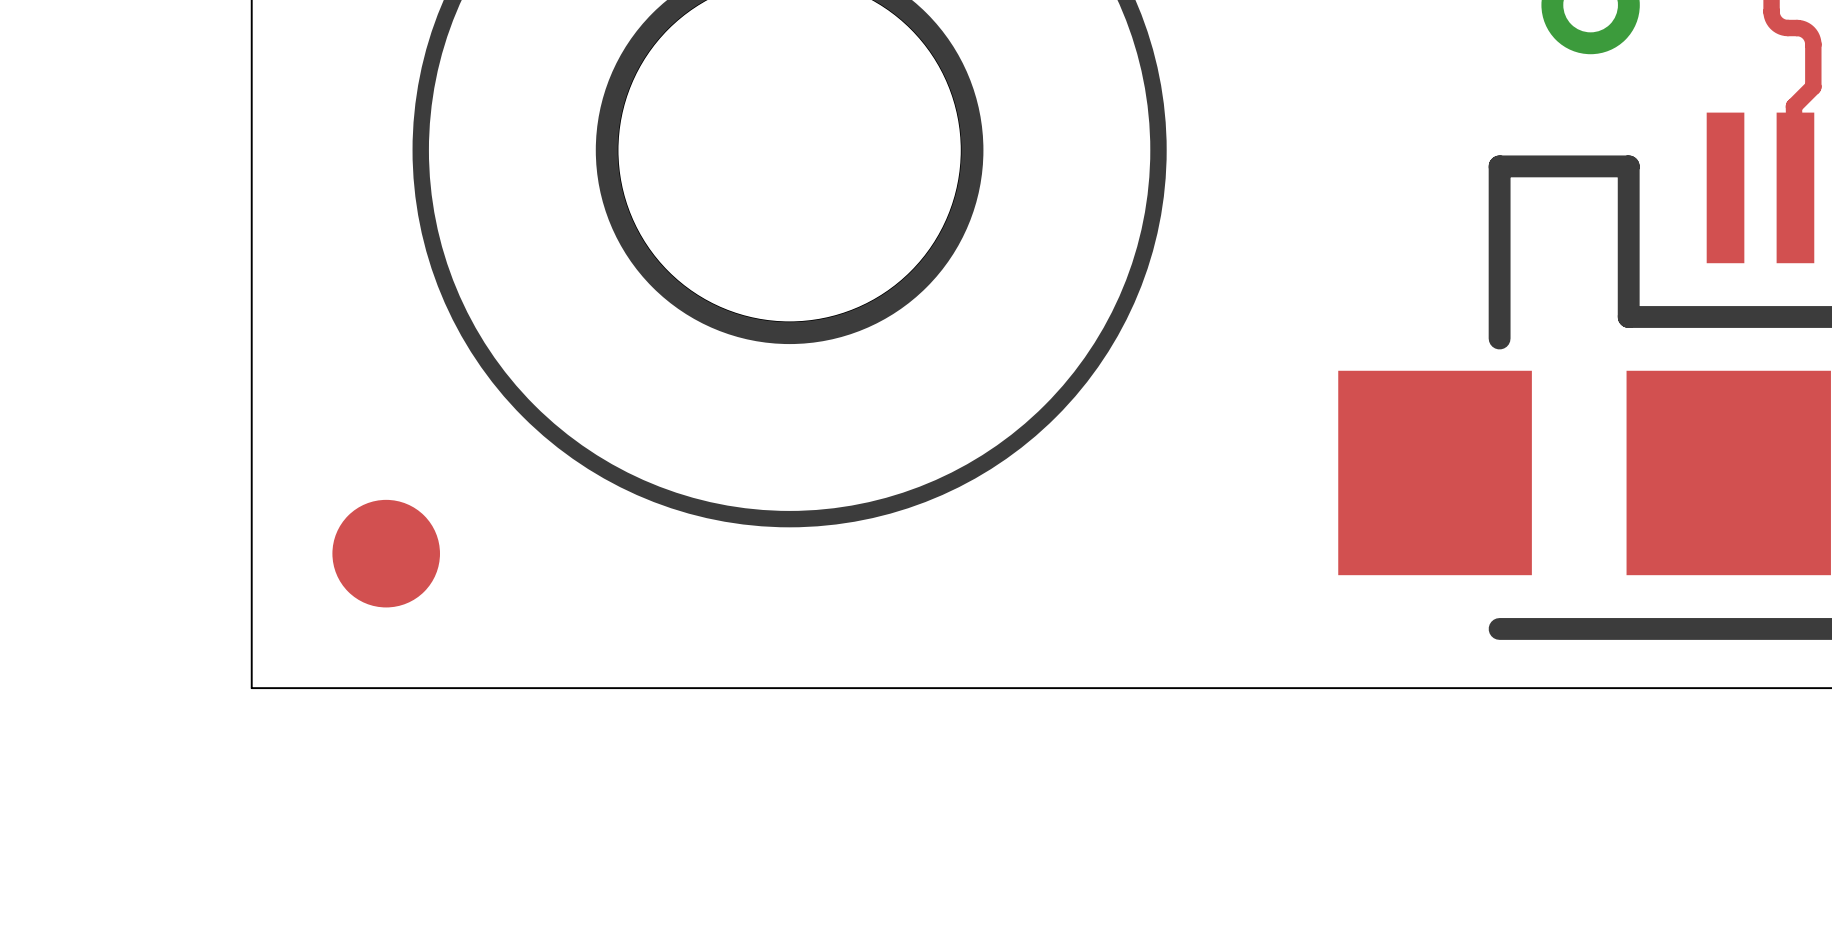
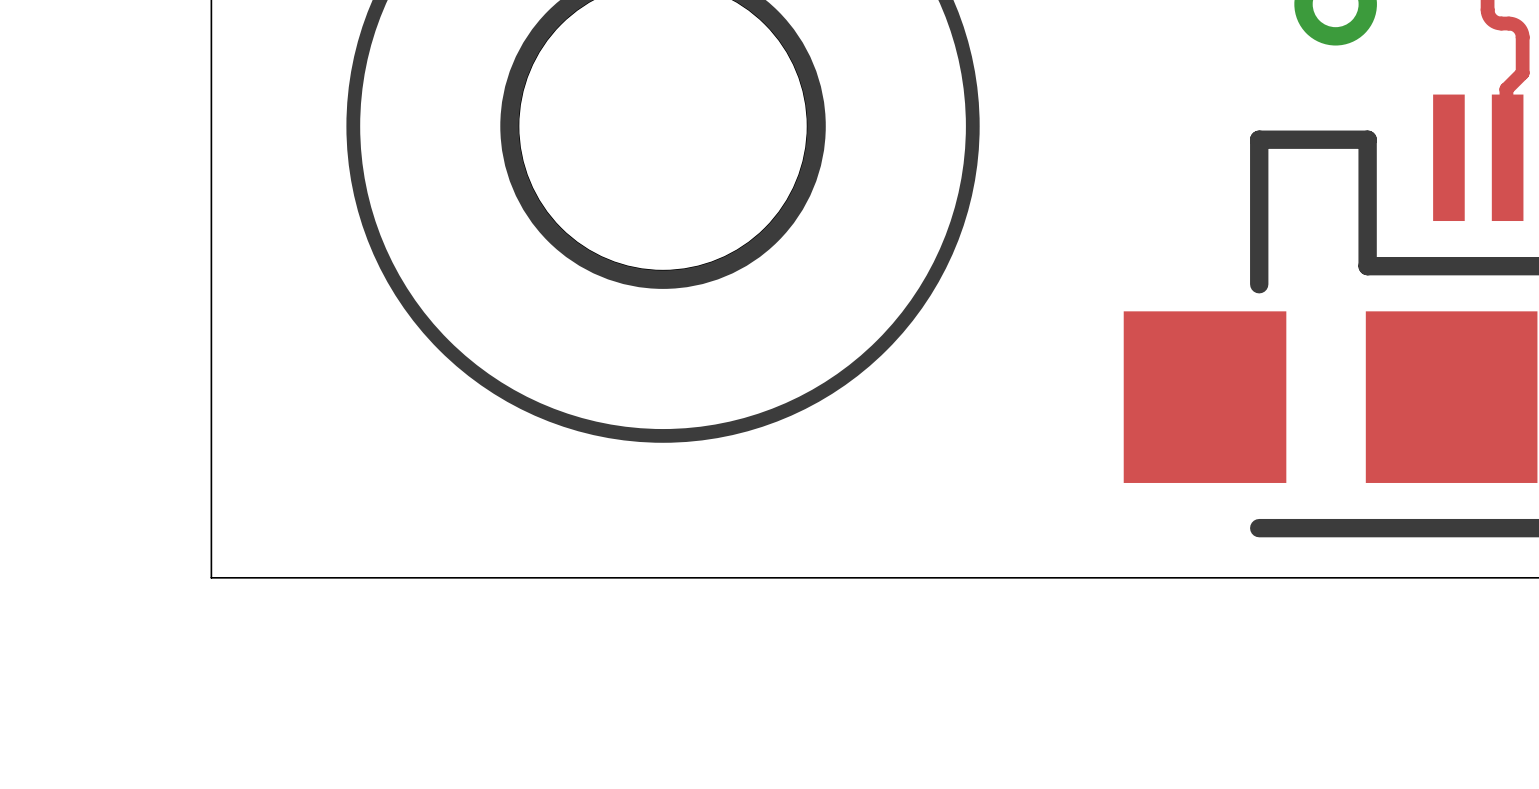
part: (386, 553) -> none

